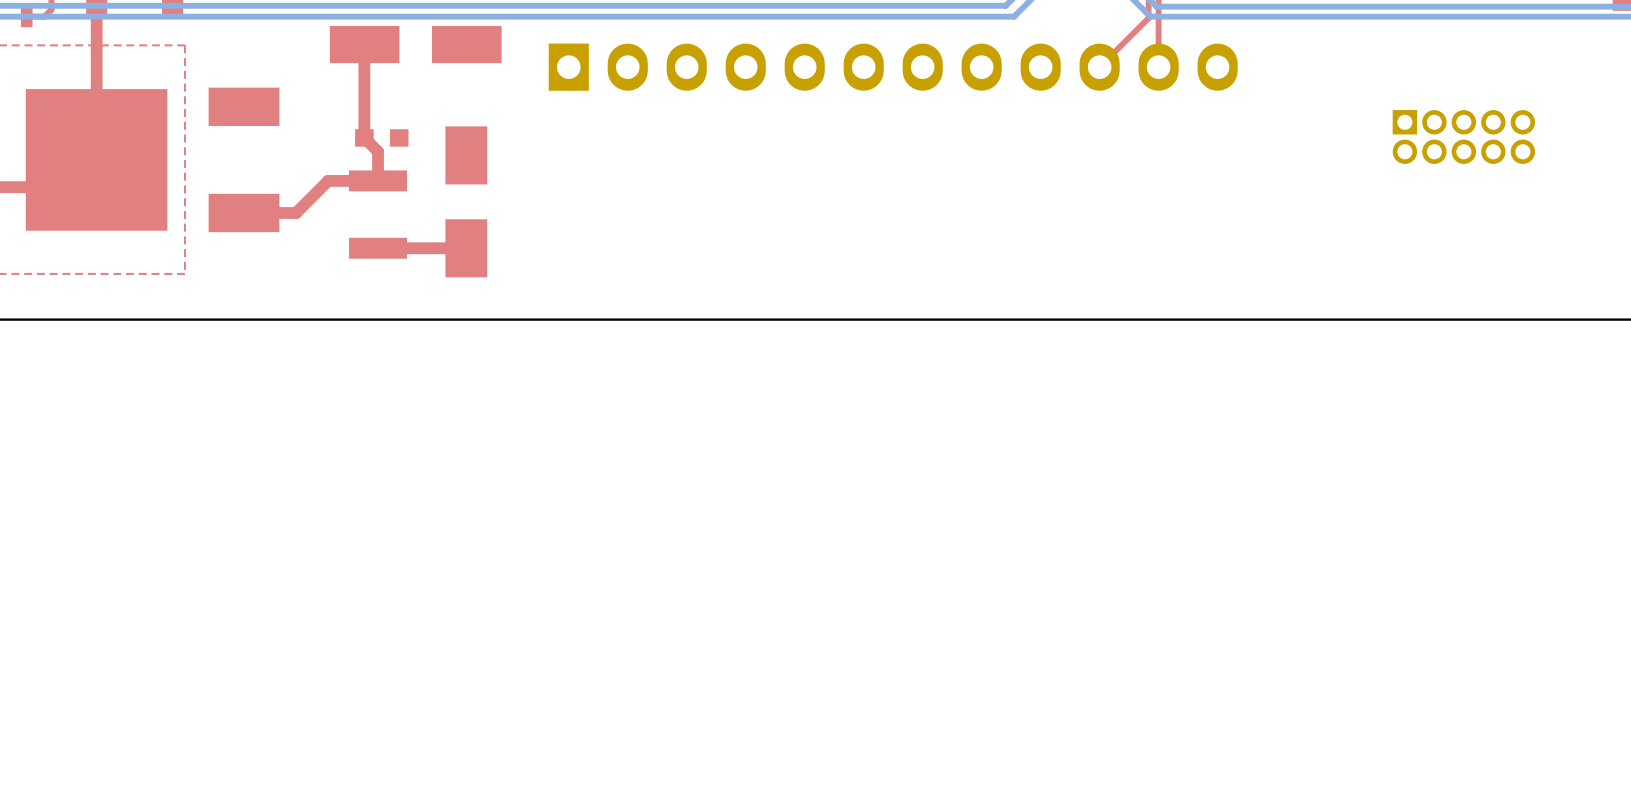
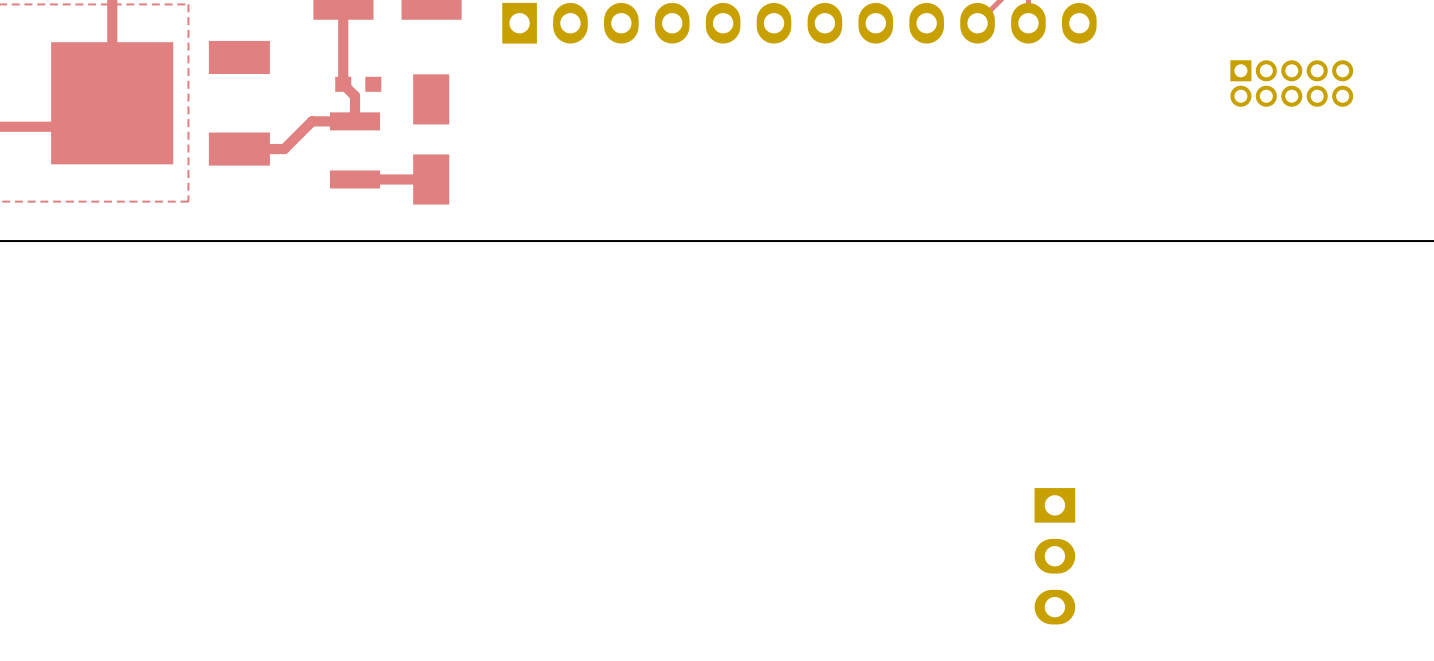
part: none -> (1054, 556)

